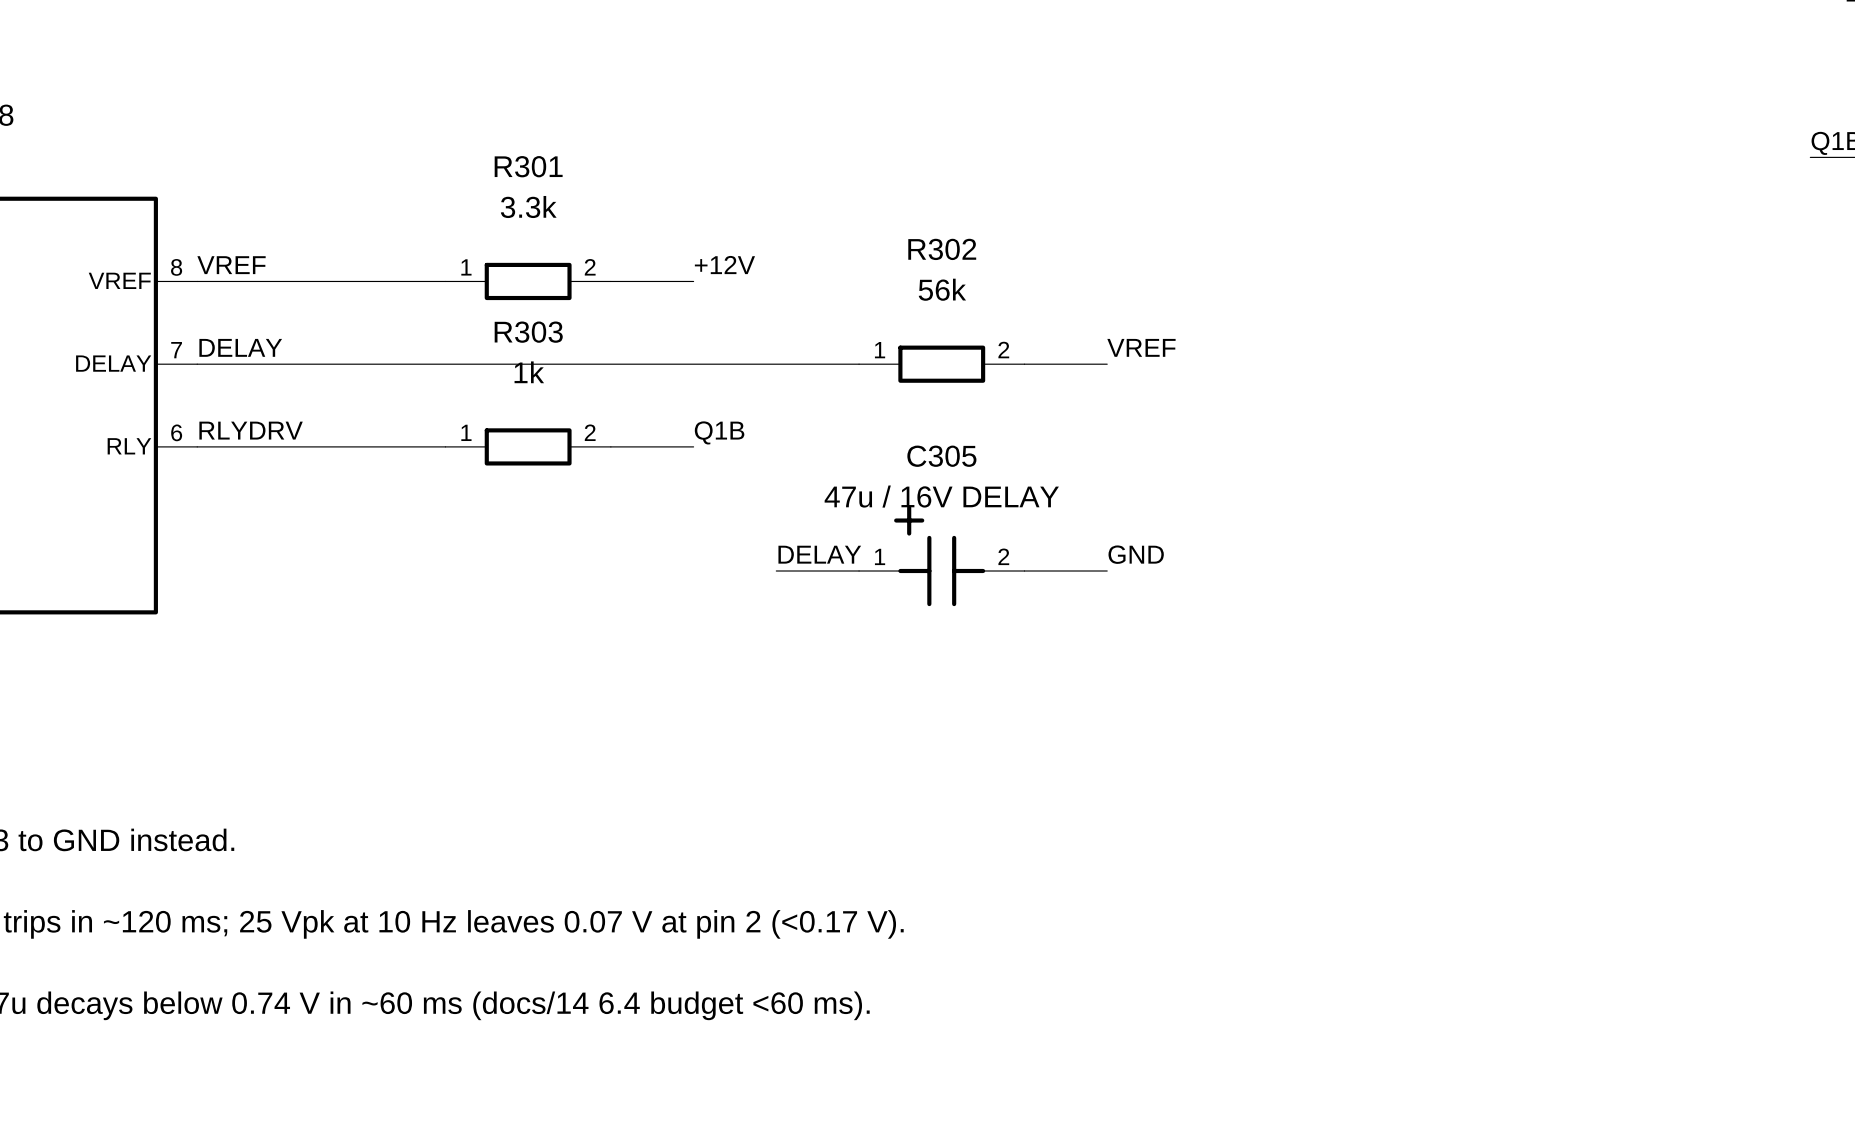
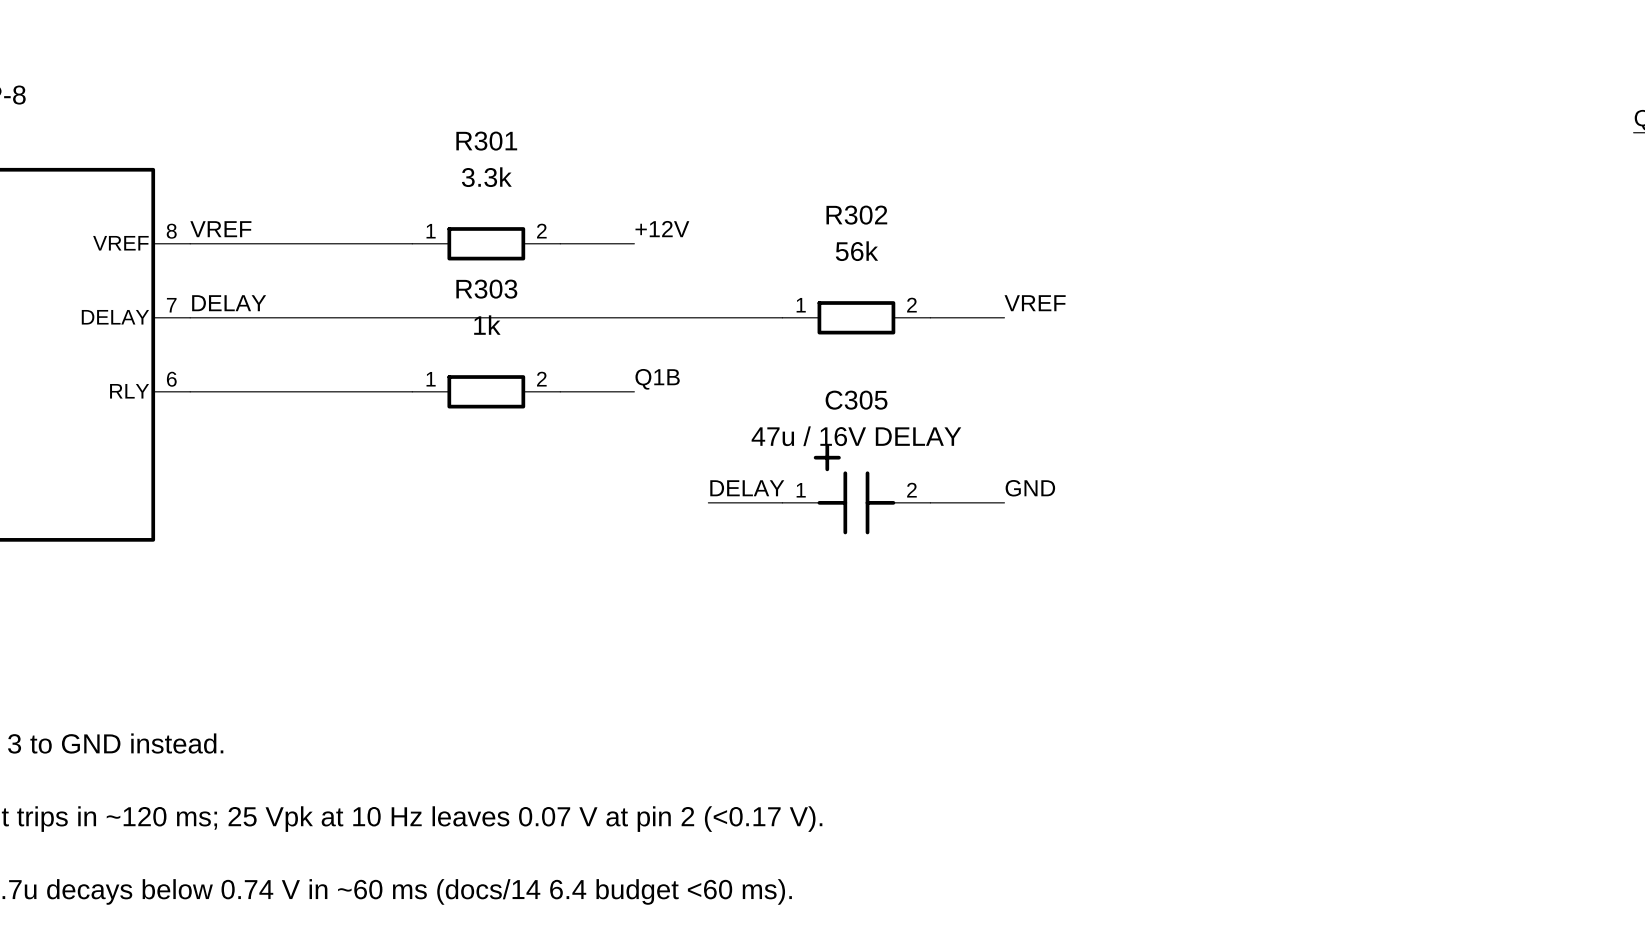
label: RLYDRV (251, 430) -> none

